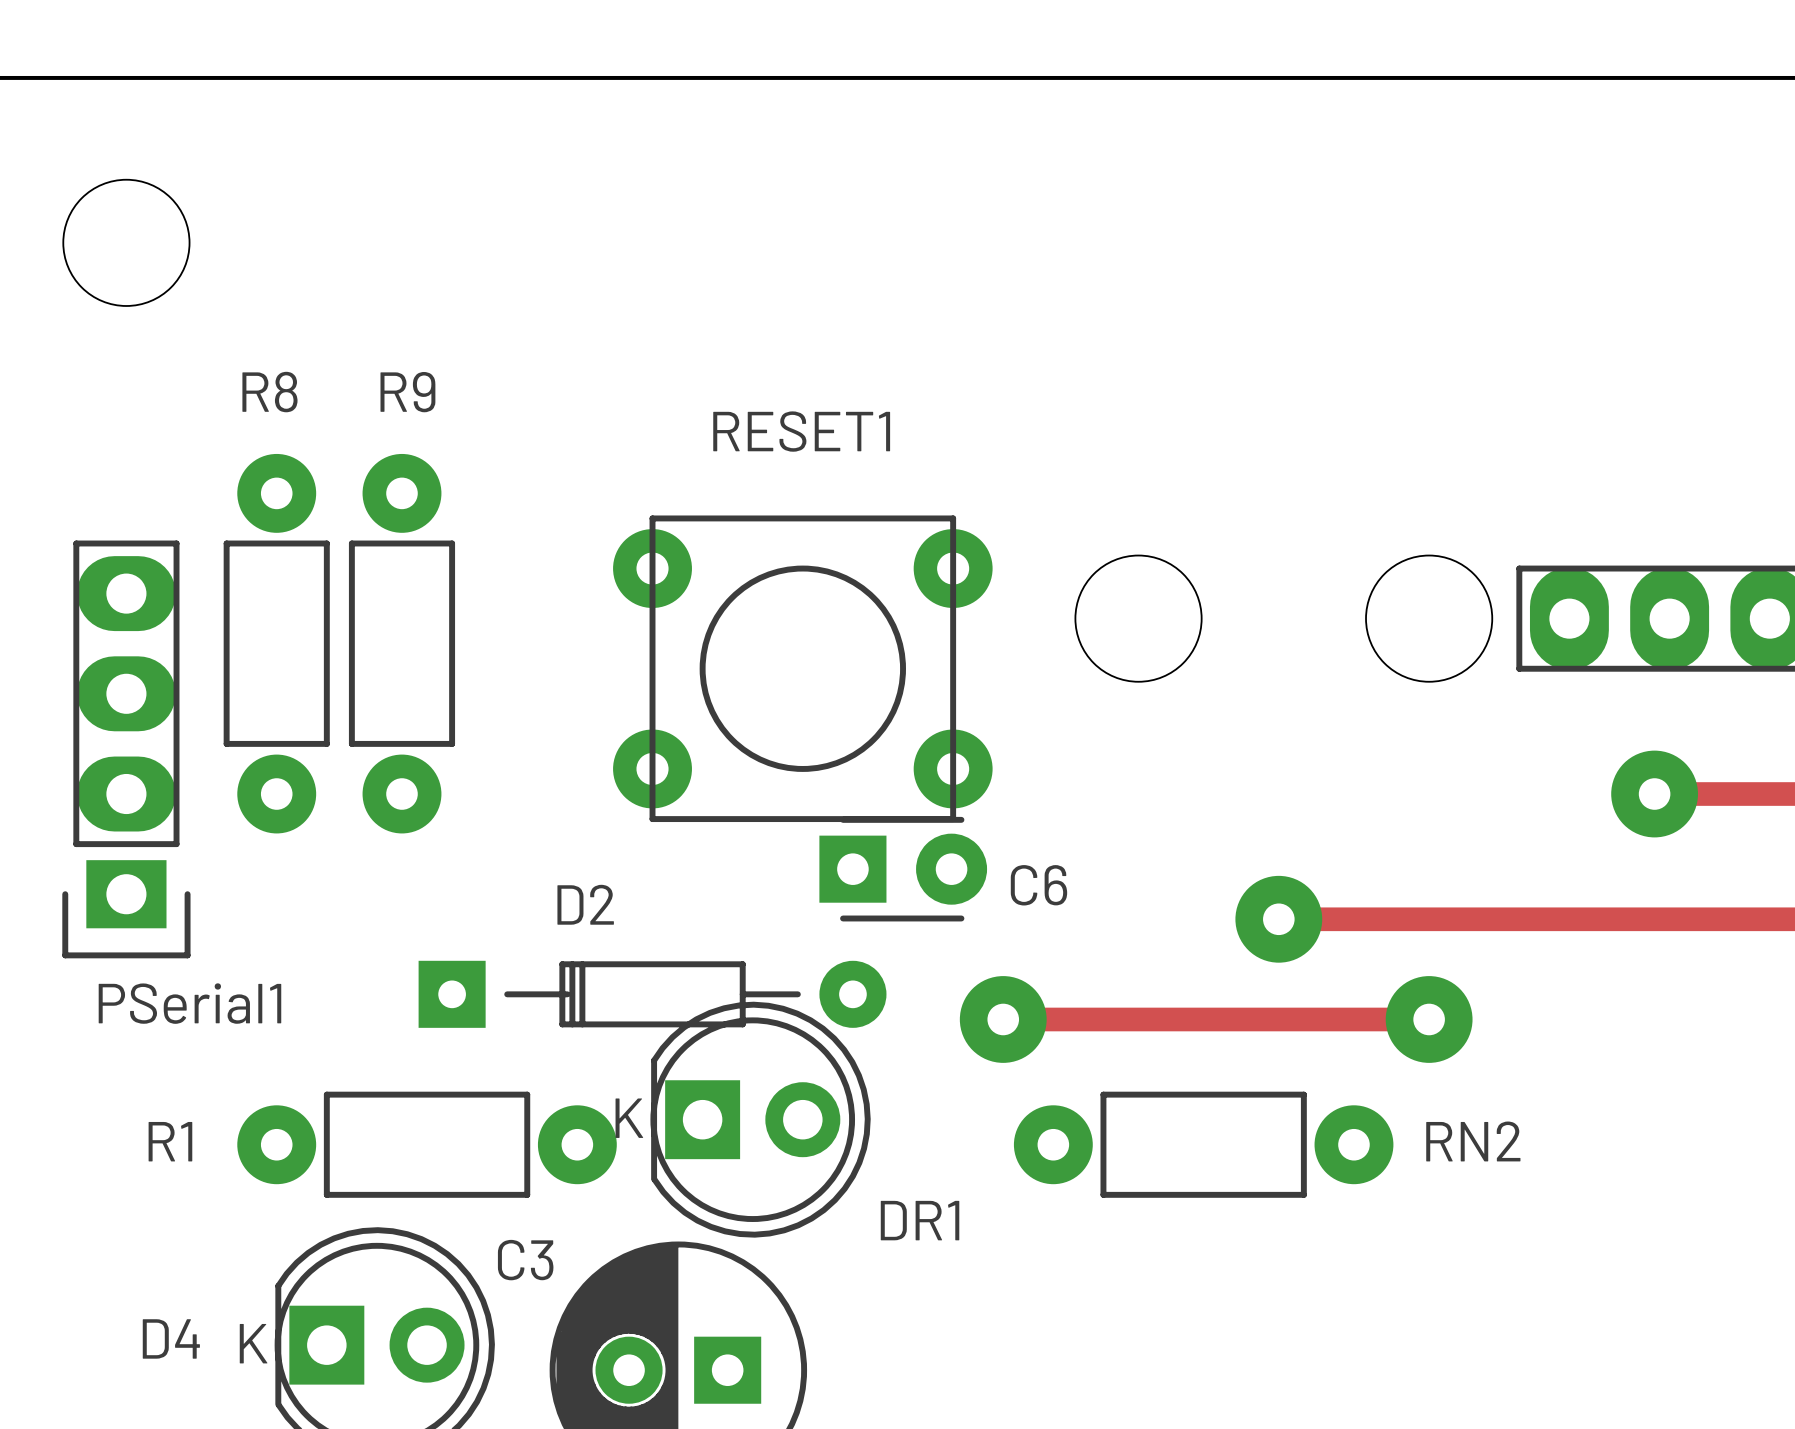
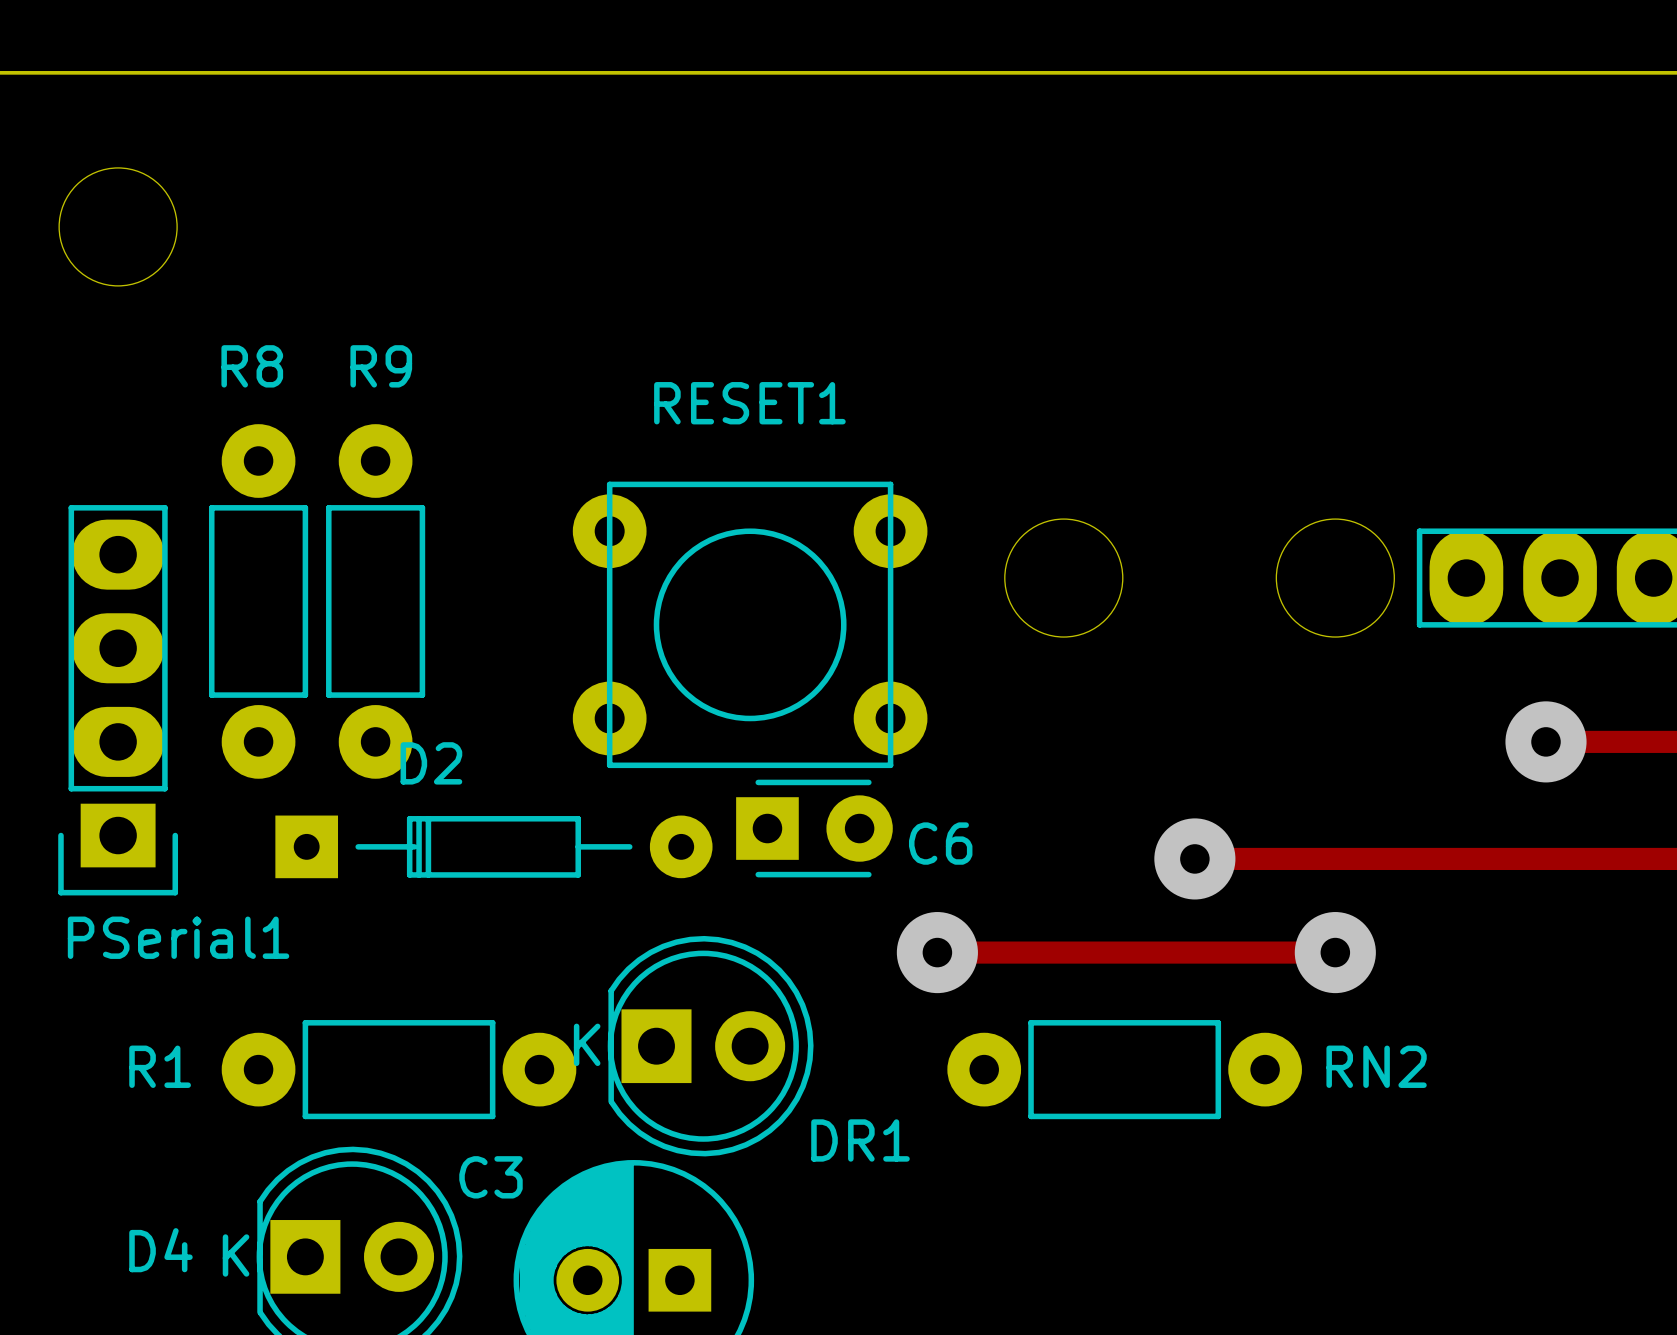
C6 position: (903, 869) -> (814, 828)
D2 position: (652, 994) -> (493, 846)

